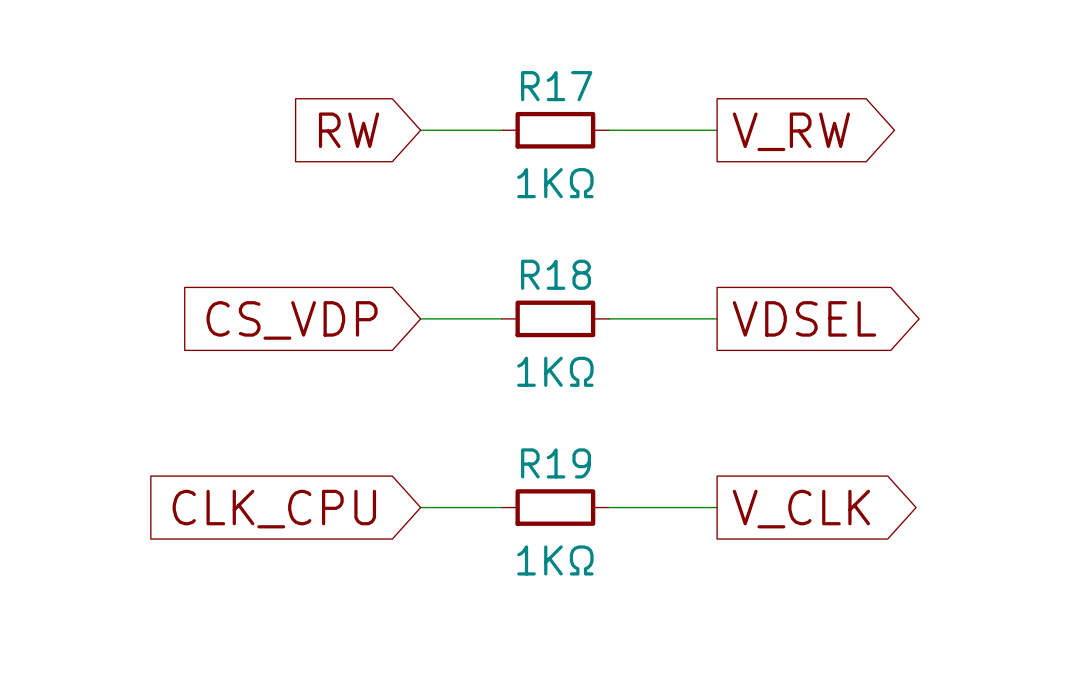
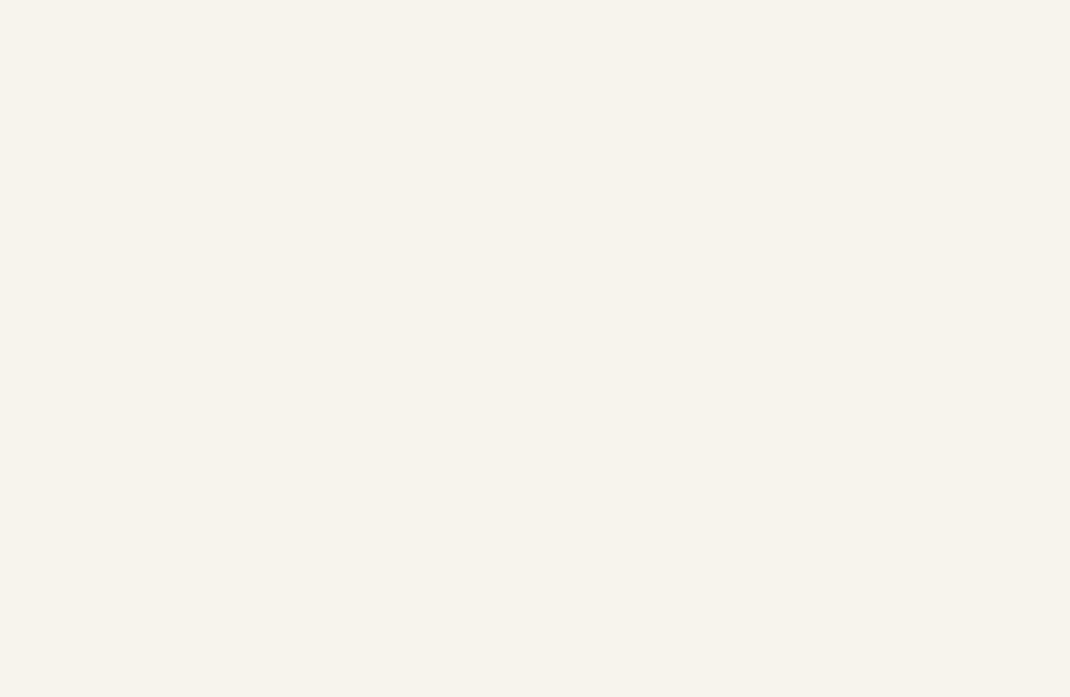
global label: RW (349, 130) -> none
wire: (420, 130) (501, 130) -> none
R17: 1KΩ (555, 130) -> none
wire: (609, 130) (717, 130) -> none
global label: V_RW (791, 131) -> none
wire: (420, 318) (501, 318) -> none
R18: 1KΩ (555, 318) -> none
wire: (609, 318) (717, 318) -> none
global label: VDSEL (804, 318) -> none
global label: CS_VDP (292, 320) -> none
wire: (420, 507) (501, 507) -> none
R19: 1KΩ (555, 507) -> none
wire: (609, 507) (717, 507) -> none
global label: CLK_CPU (274, 509) -> none
global label: V_CLK (801, 509) -> none

